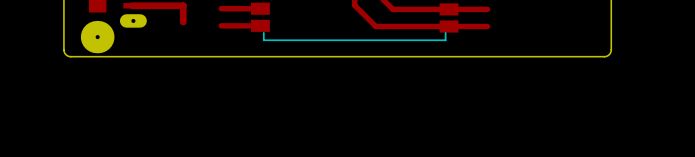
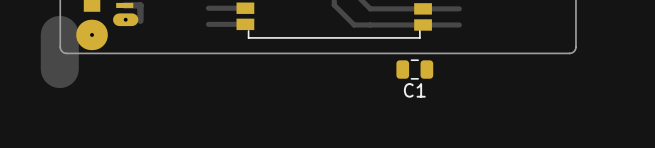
track: (149, 5) (183, 5) (183, 22) -> (140, 5) (140, 20)
track: none -> (59, 34) (60, 69)
C1: none -> (414, 69)

